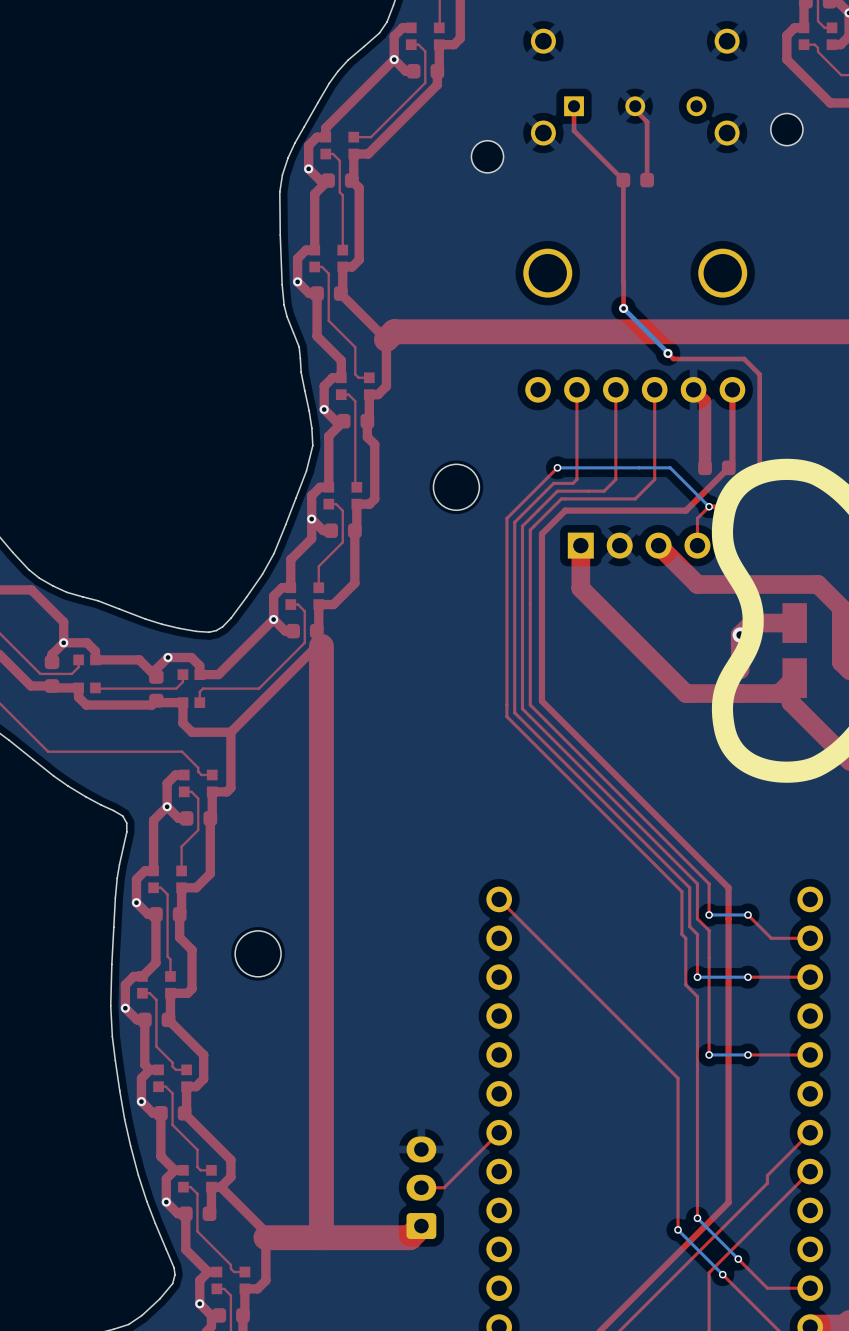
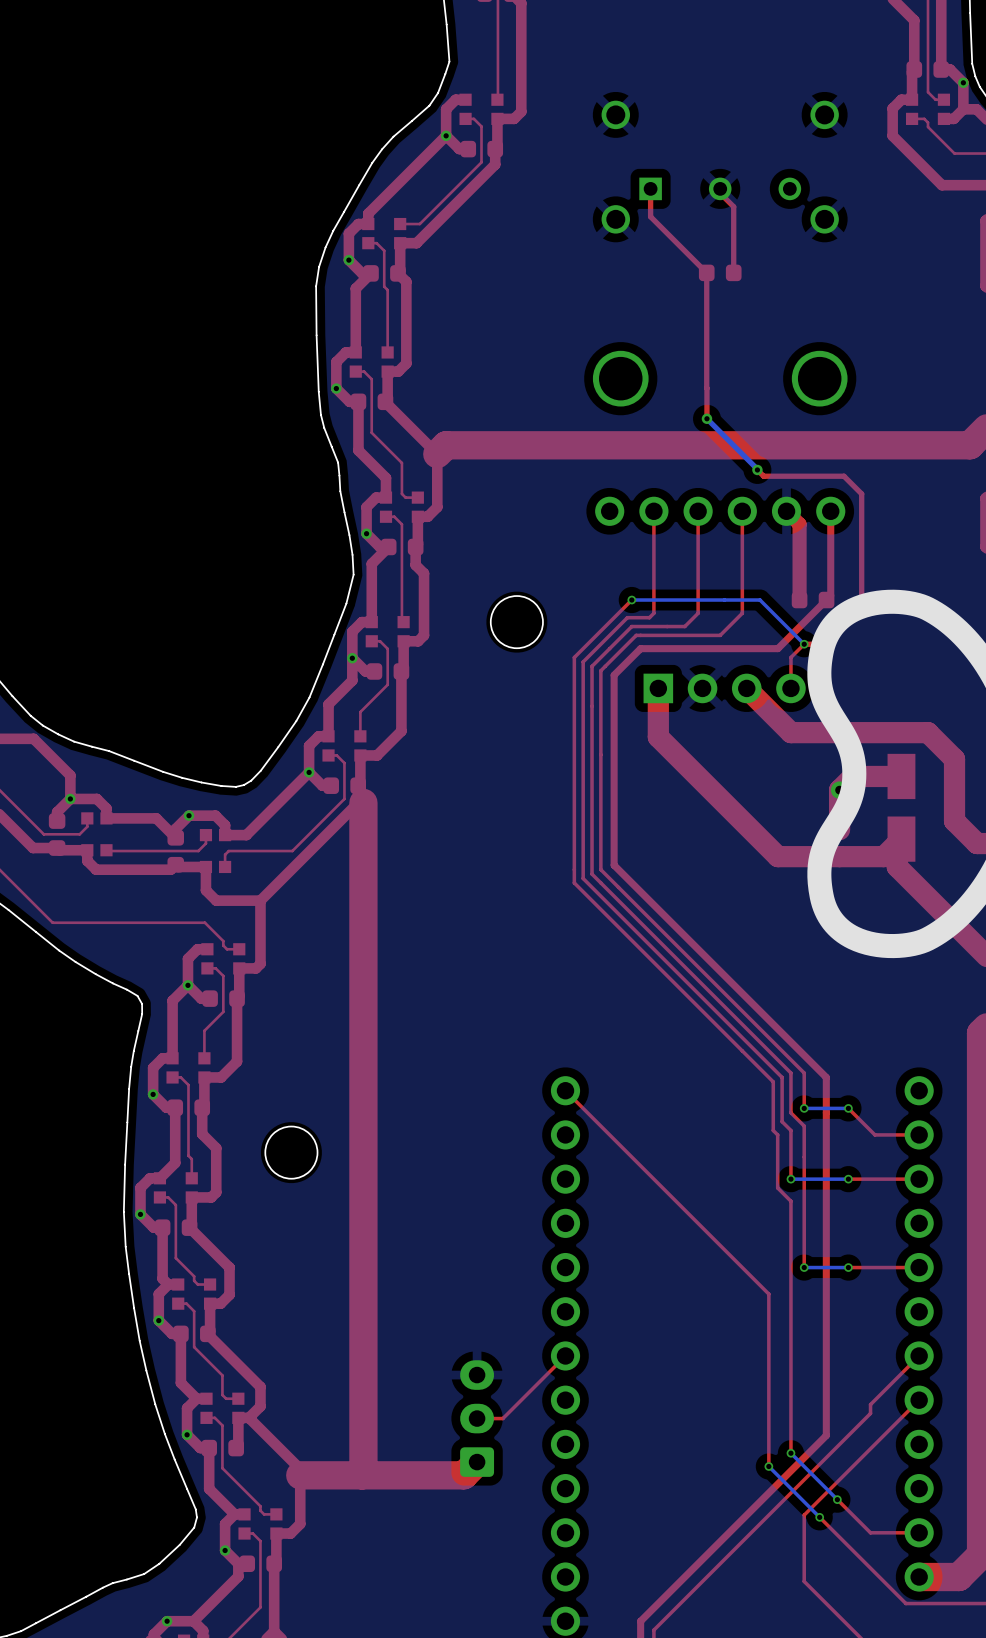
part: (786, 129) -> none
part: (487, 156) -> none

